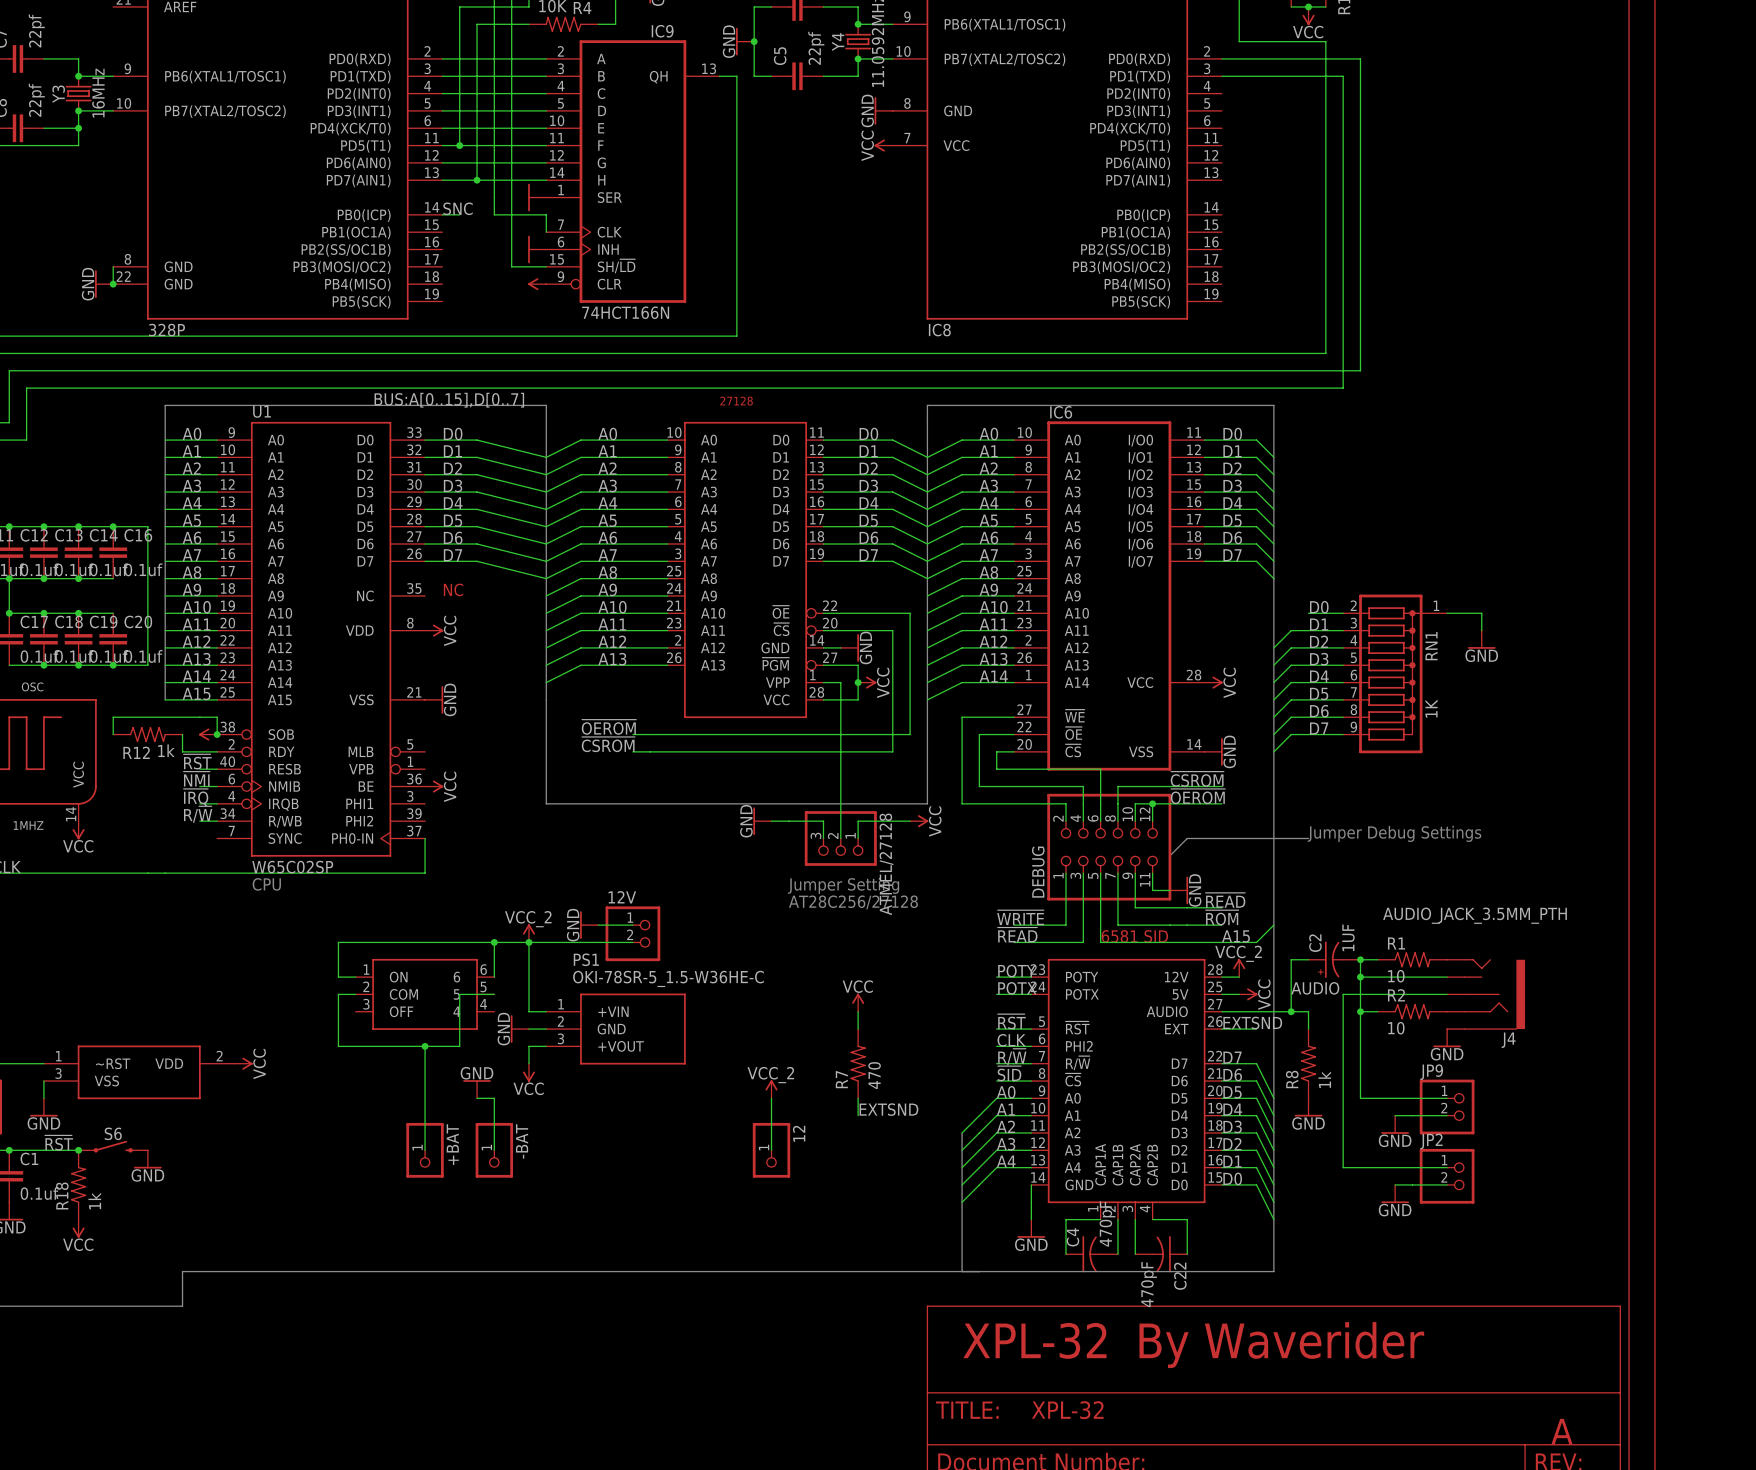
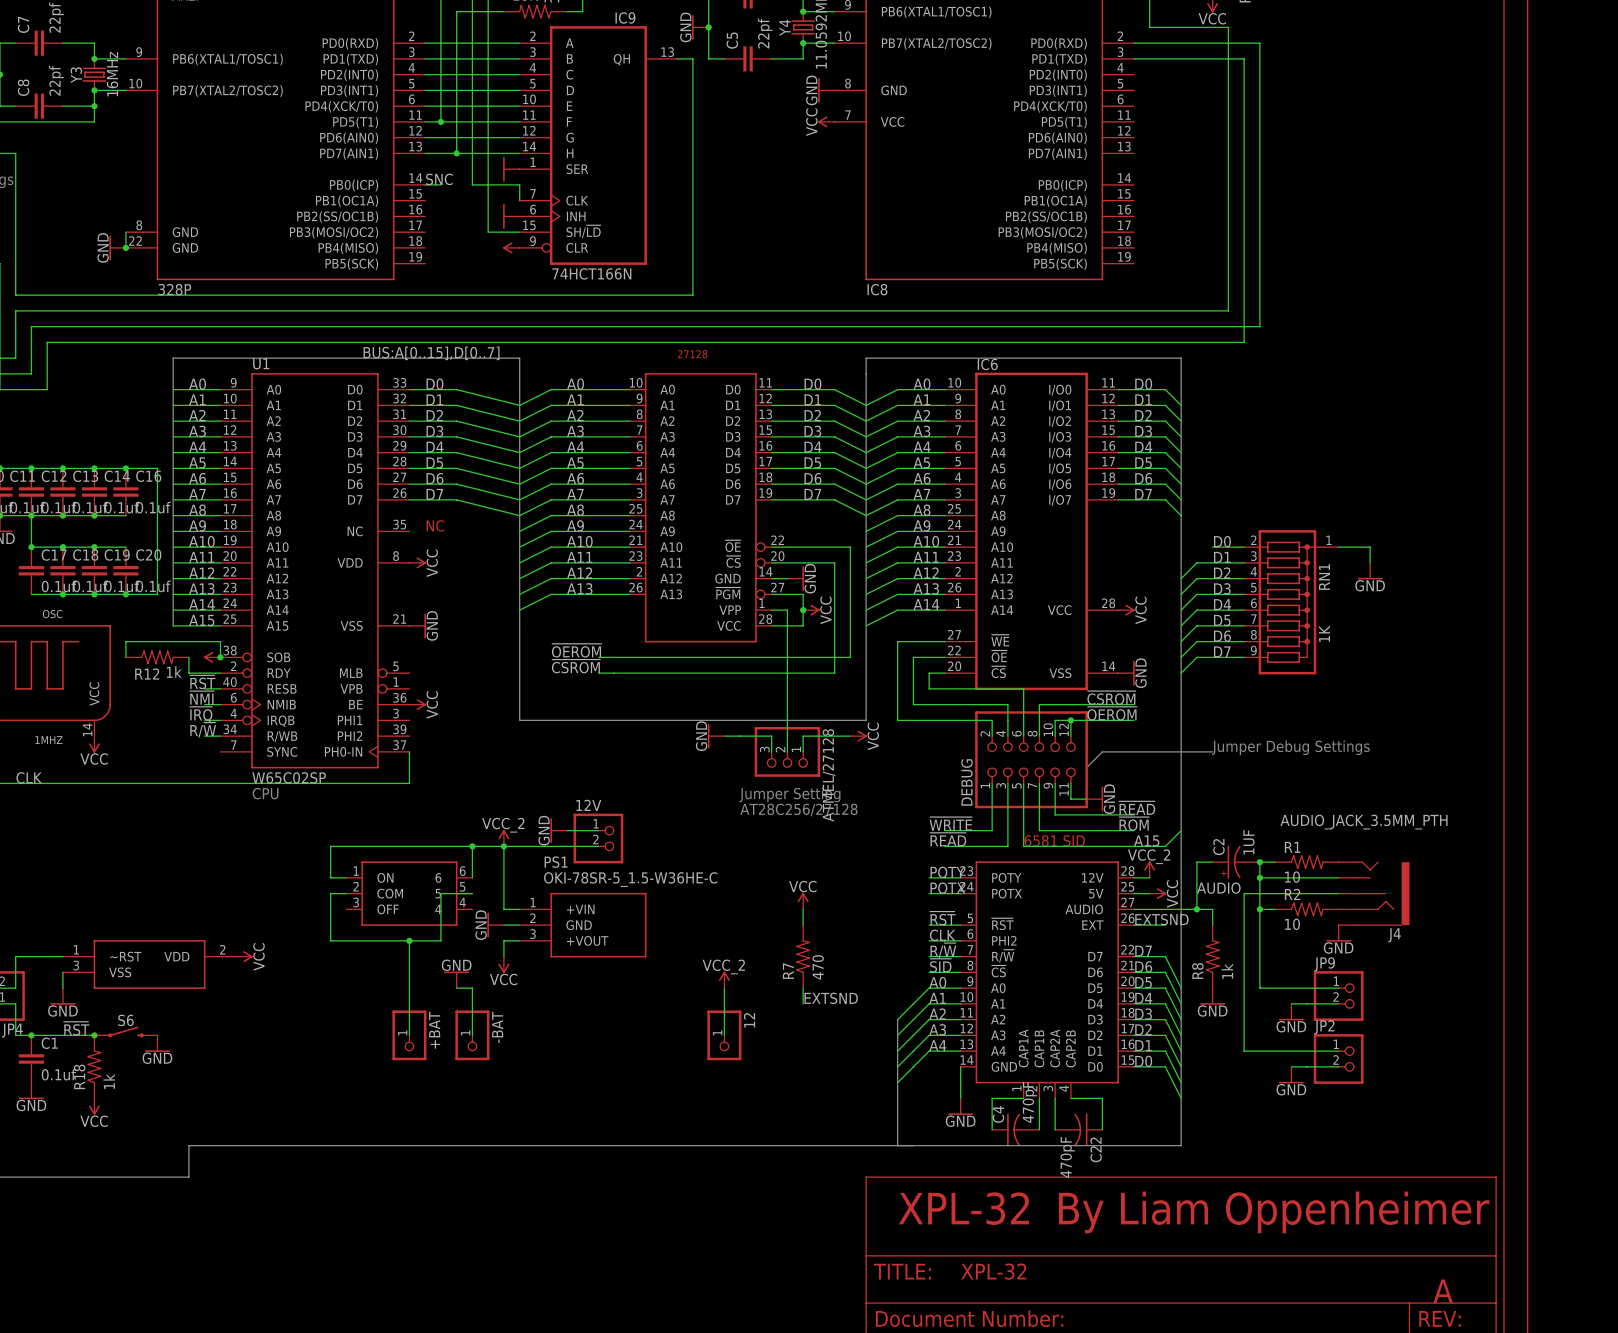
text: By Waverider (1281, 1345) -> By Liam Oppenheimer (1274, 1212)

